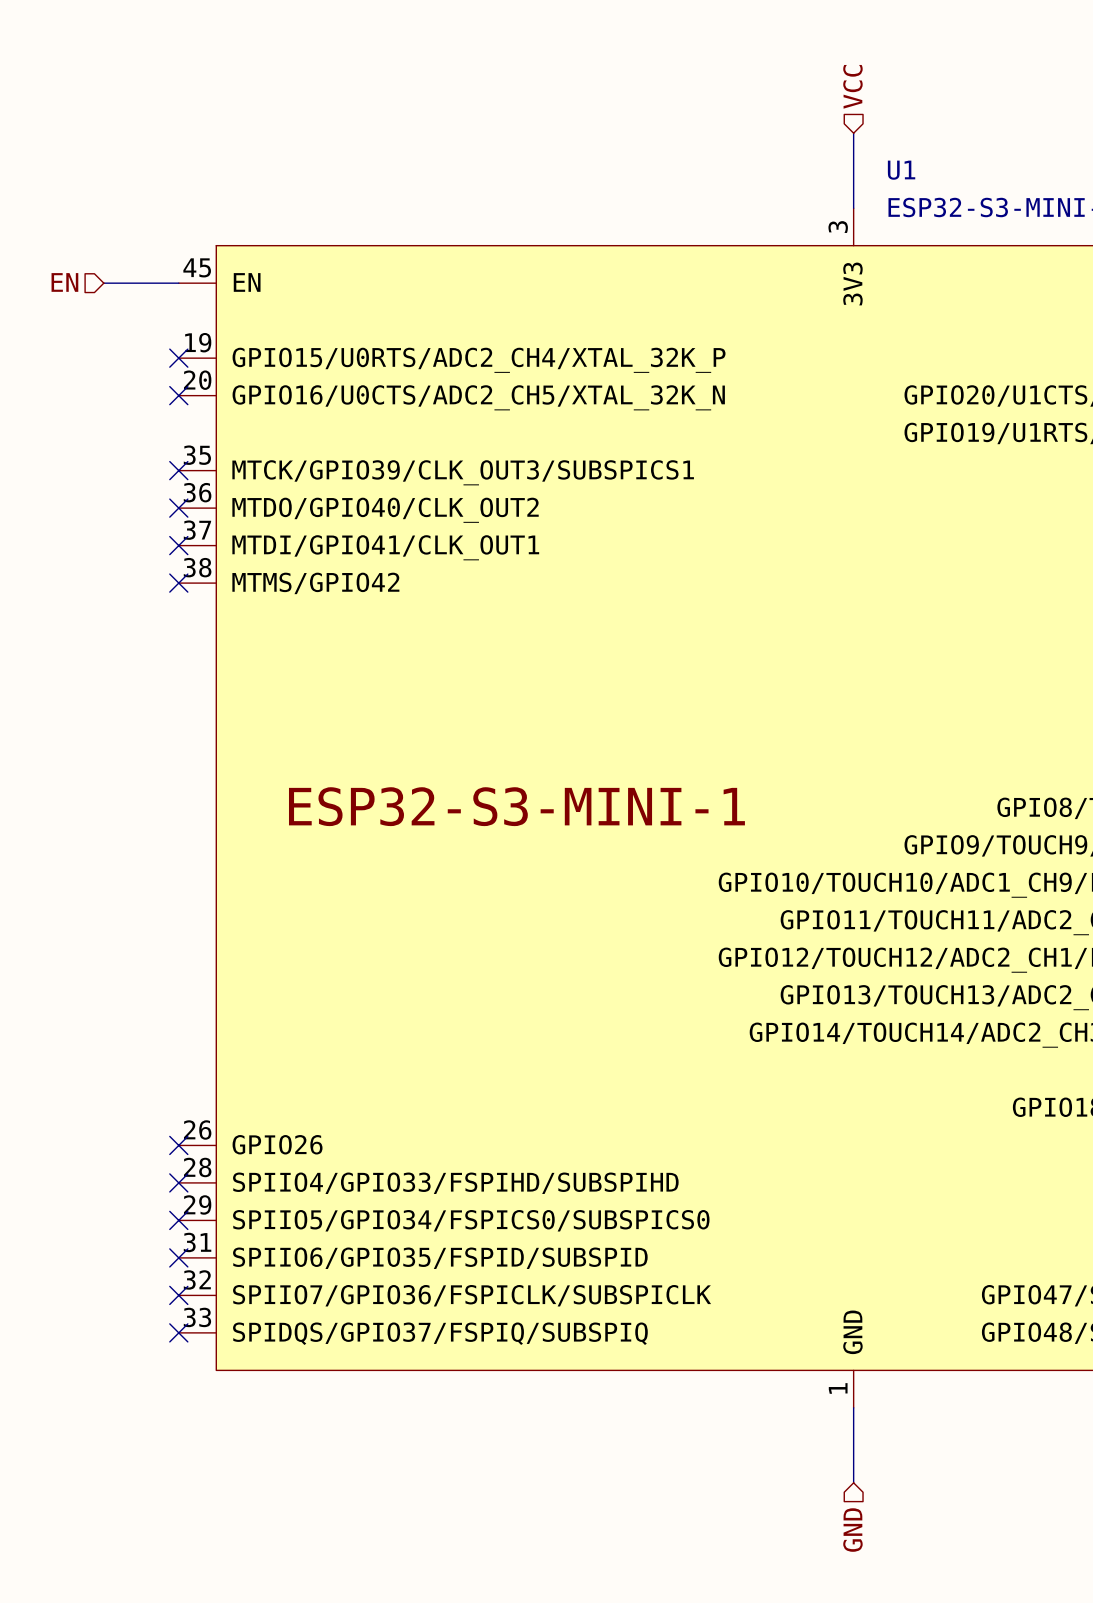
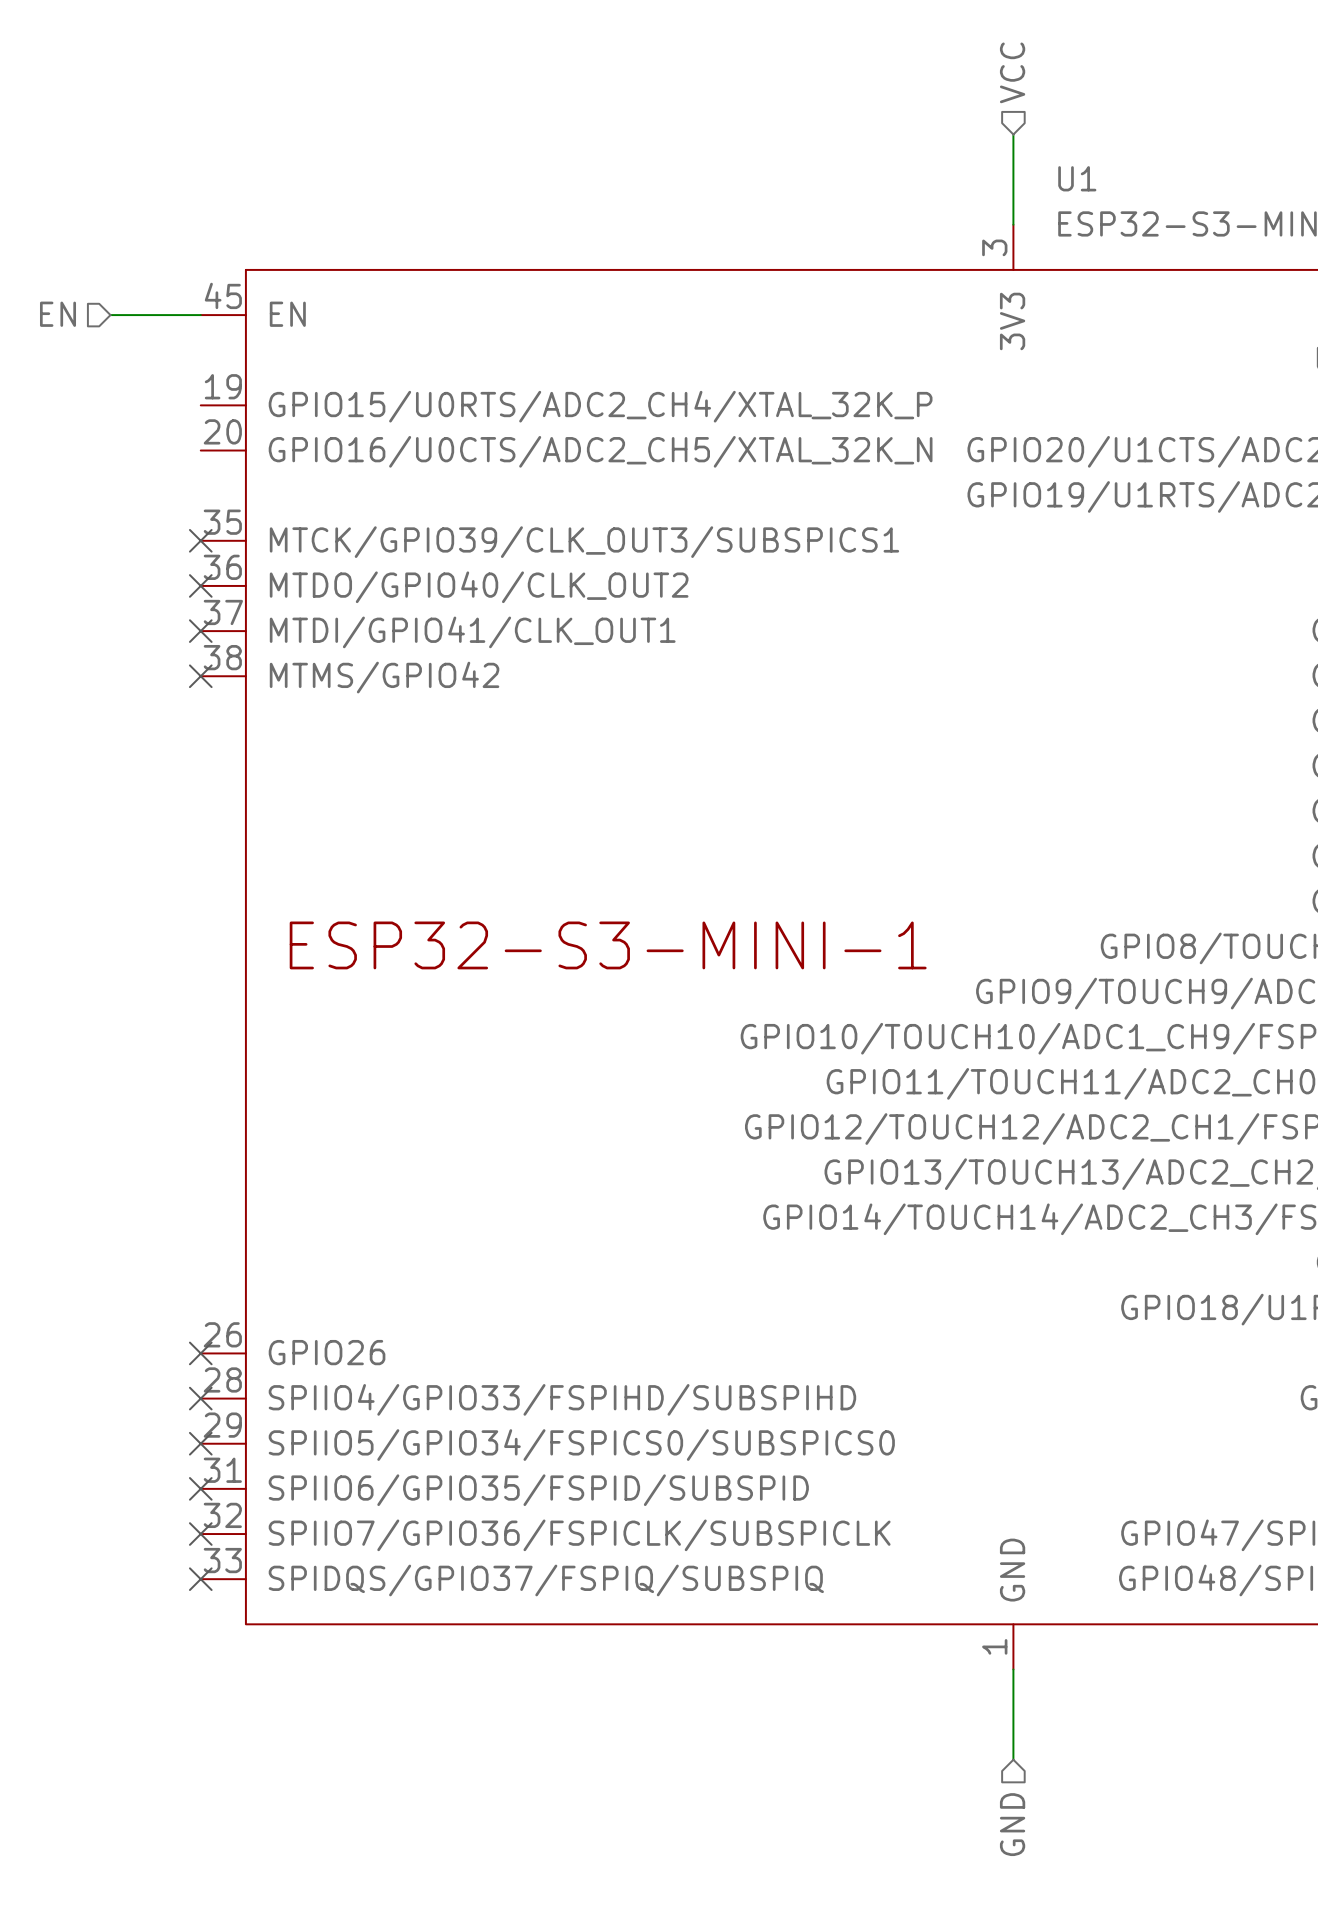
no-connect mark: (178, 358) -> none
no-connect mark: (178, 395) -> none

